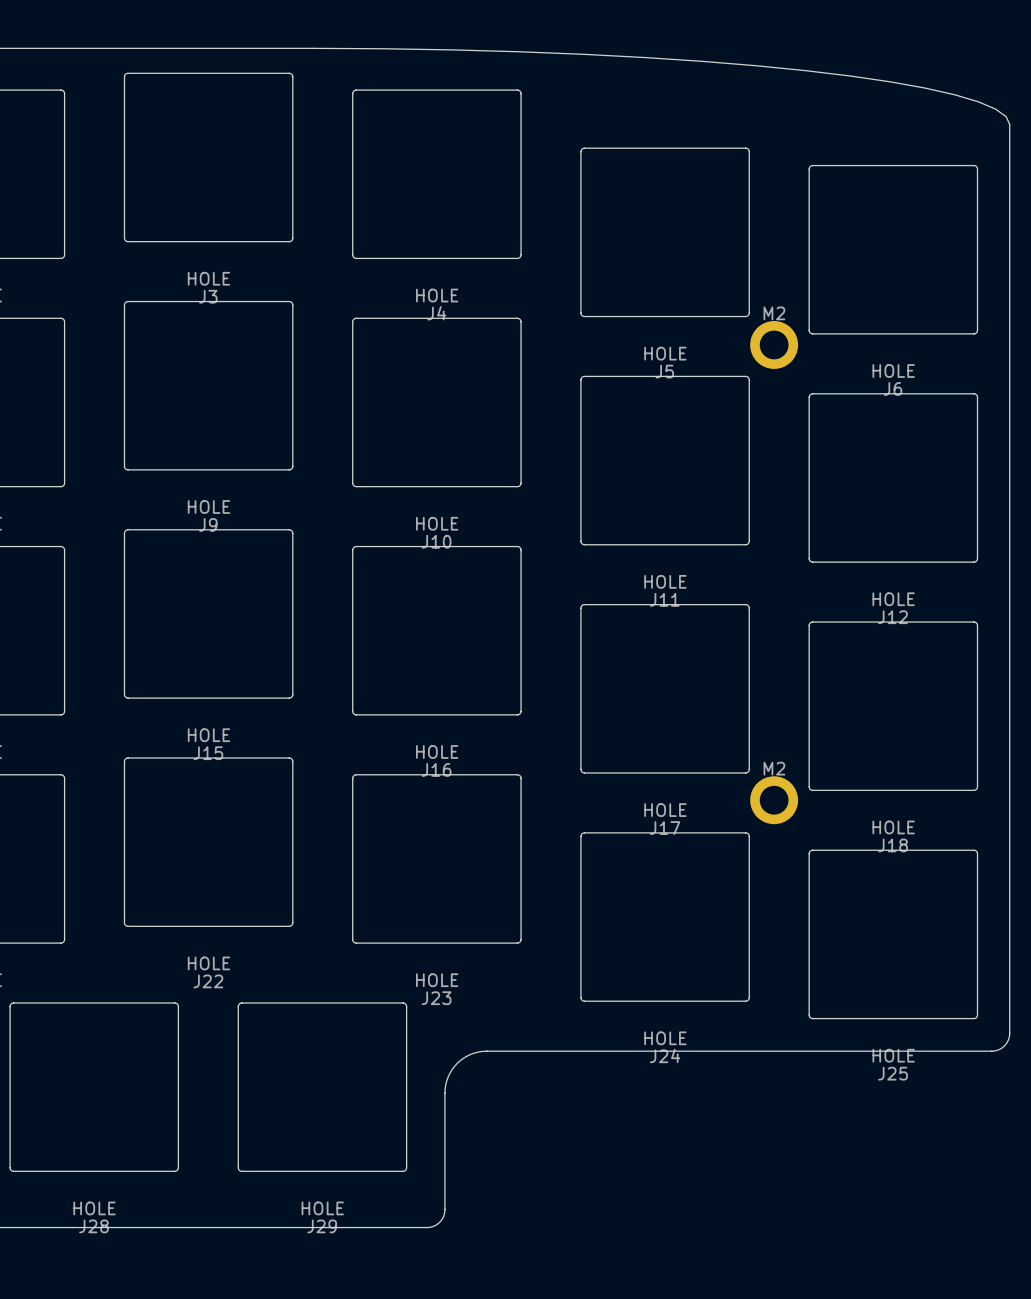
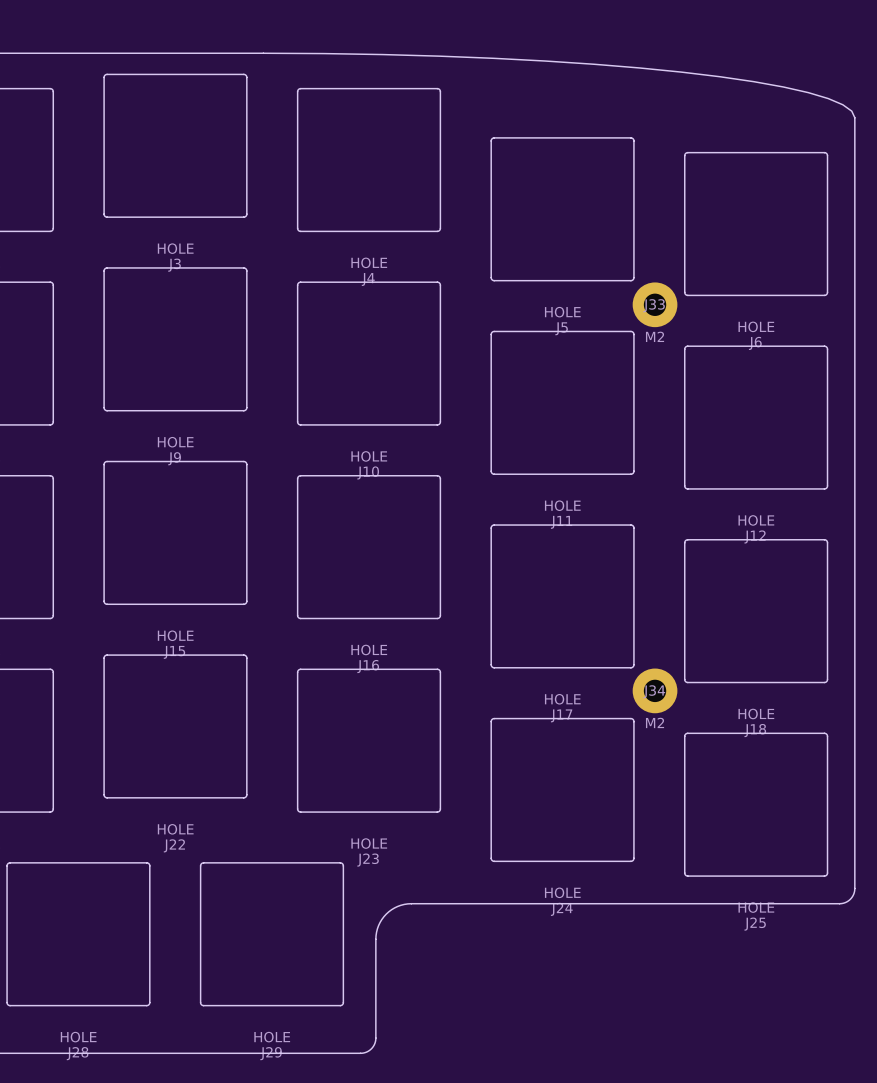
part: M2 (774, 344) -> none
J33: none -> M2 (655, 304)
part: M2 (774, 800) -> none
J34: none -> M2 (655, 690)

